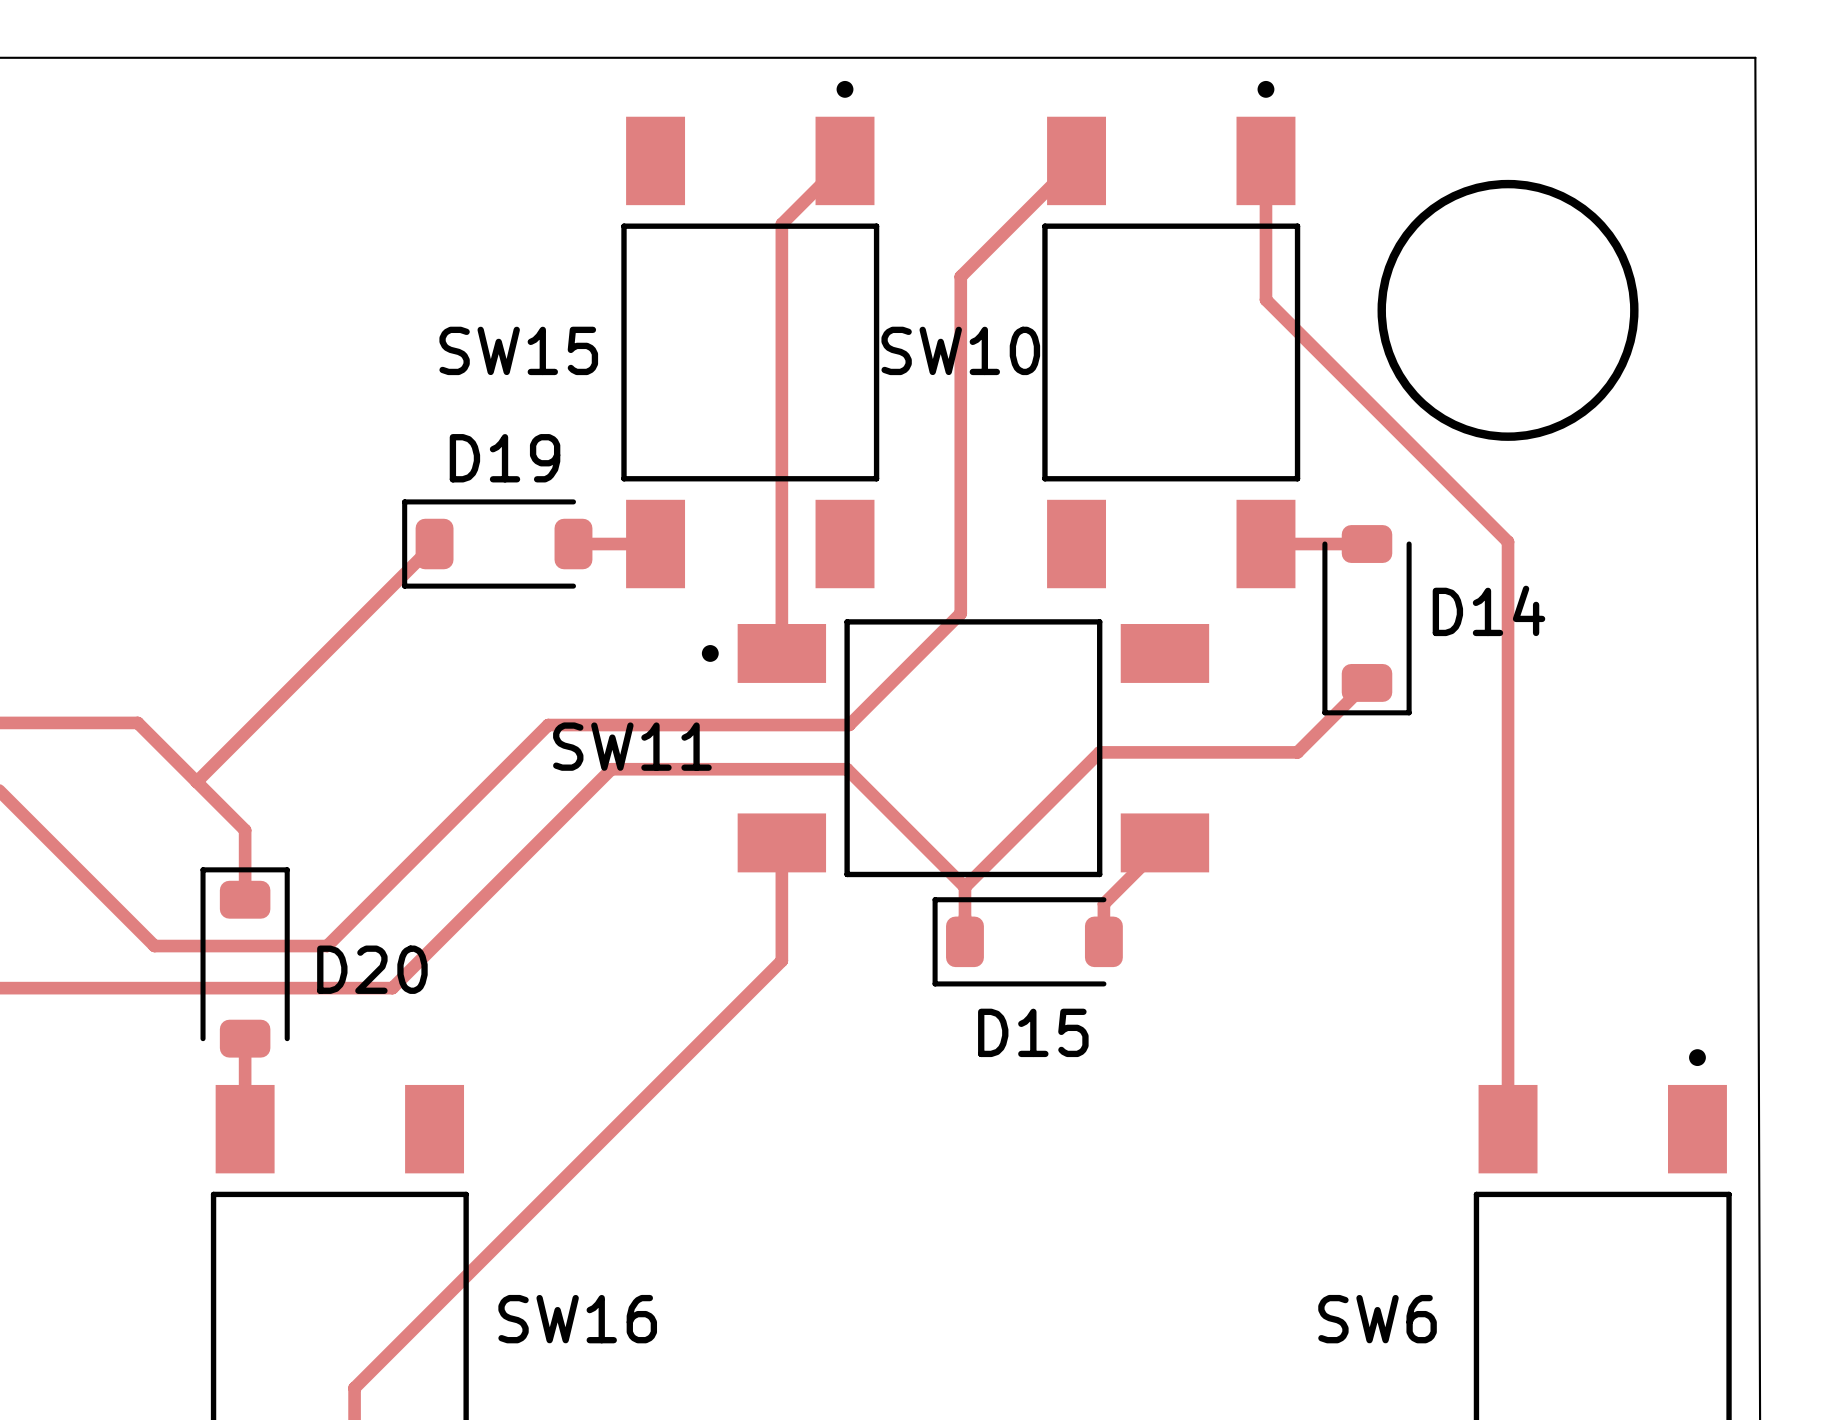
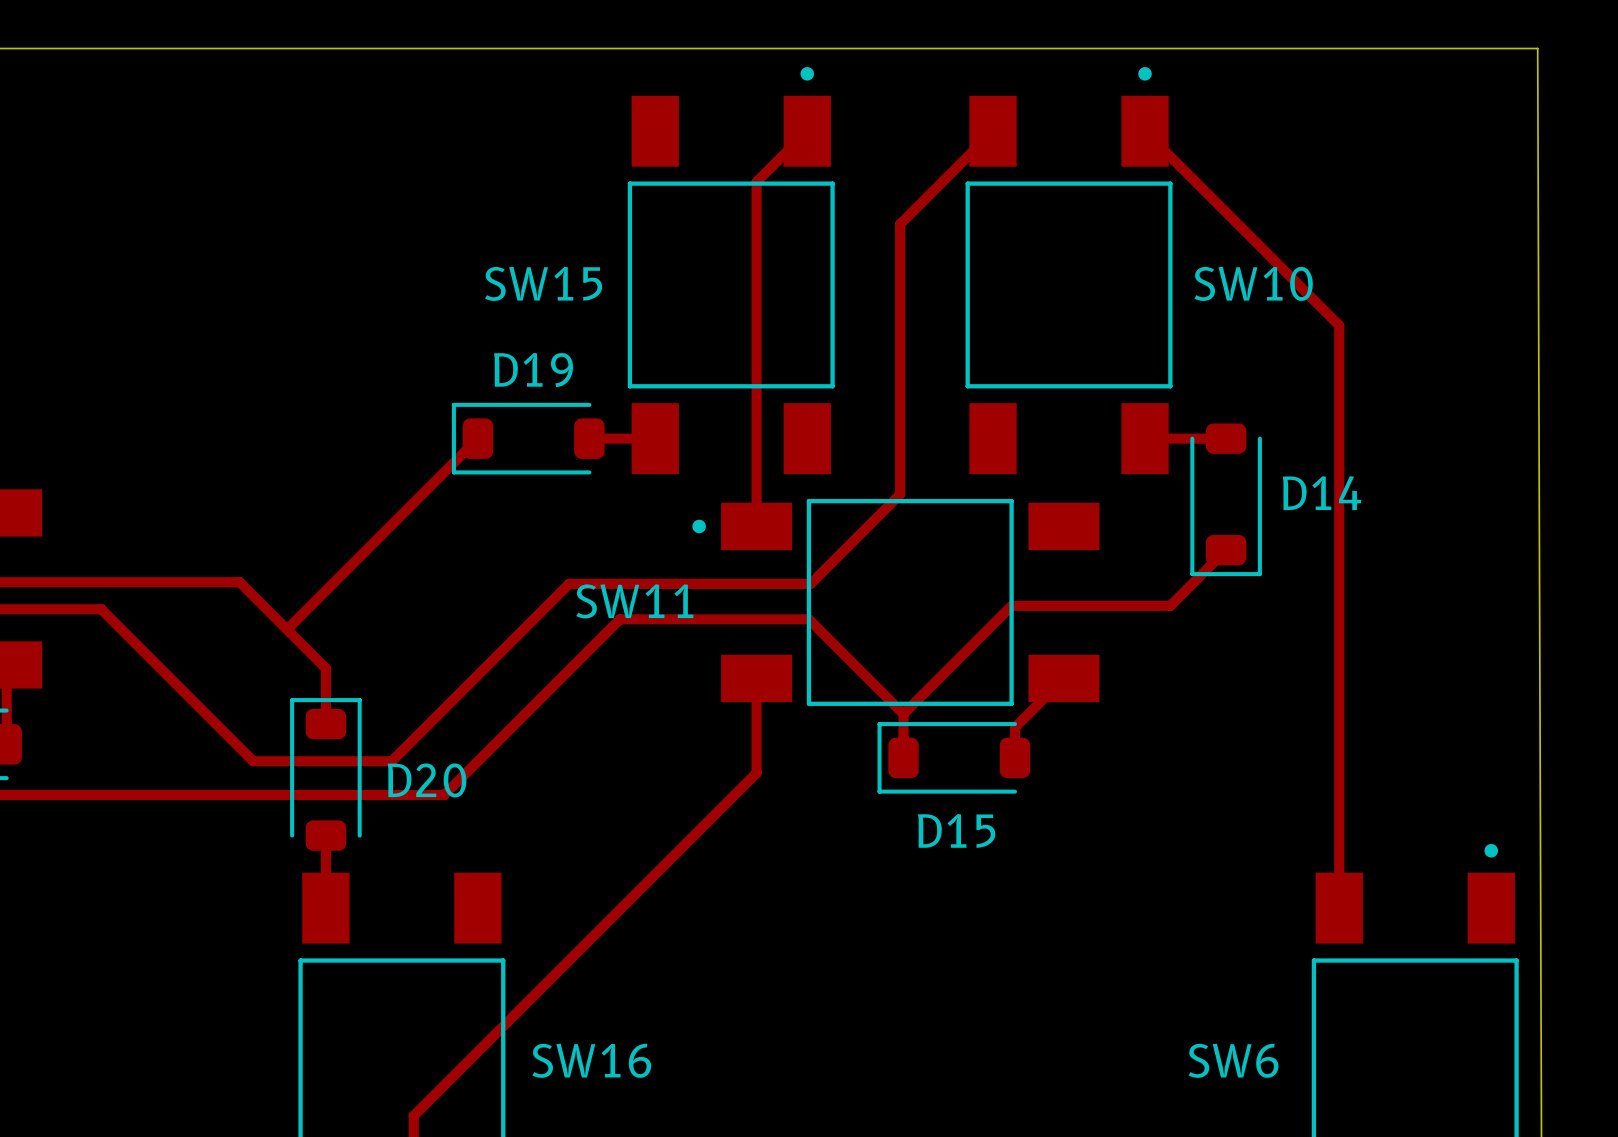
track: (1265, 160) (1265, 299) (1508, 541) -> (1145, 131) (1339, 325) (1339, 436)
round board edge: [1377, 179, 1639, 441] -> none
SW10 name position: SW10 (960, 350) -> SW10 (1253, 283)

